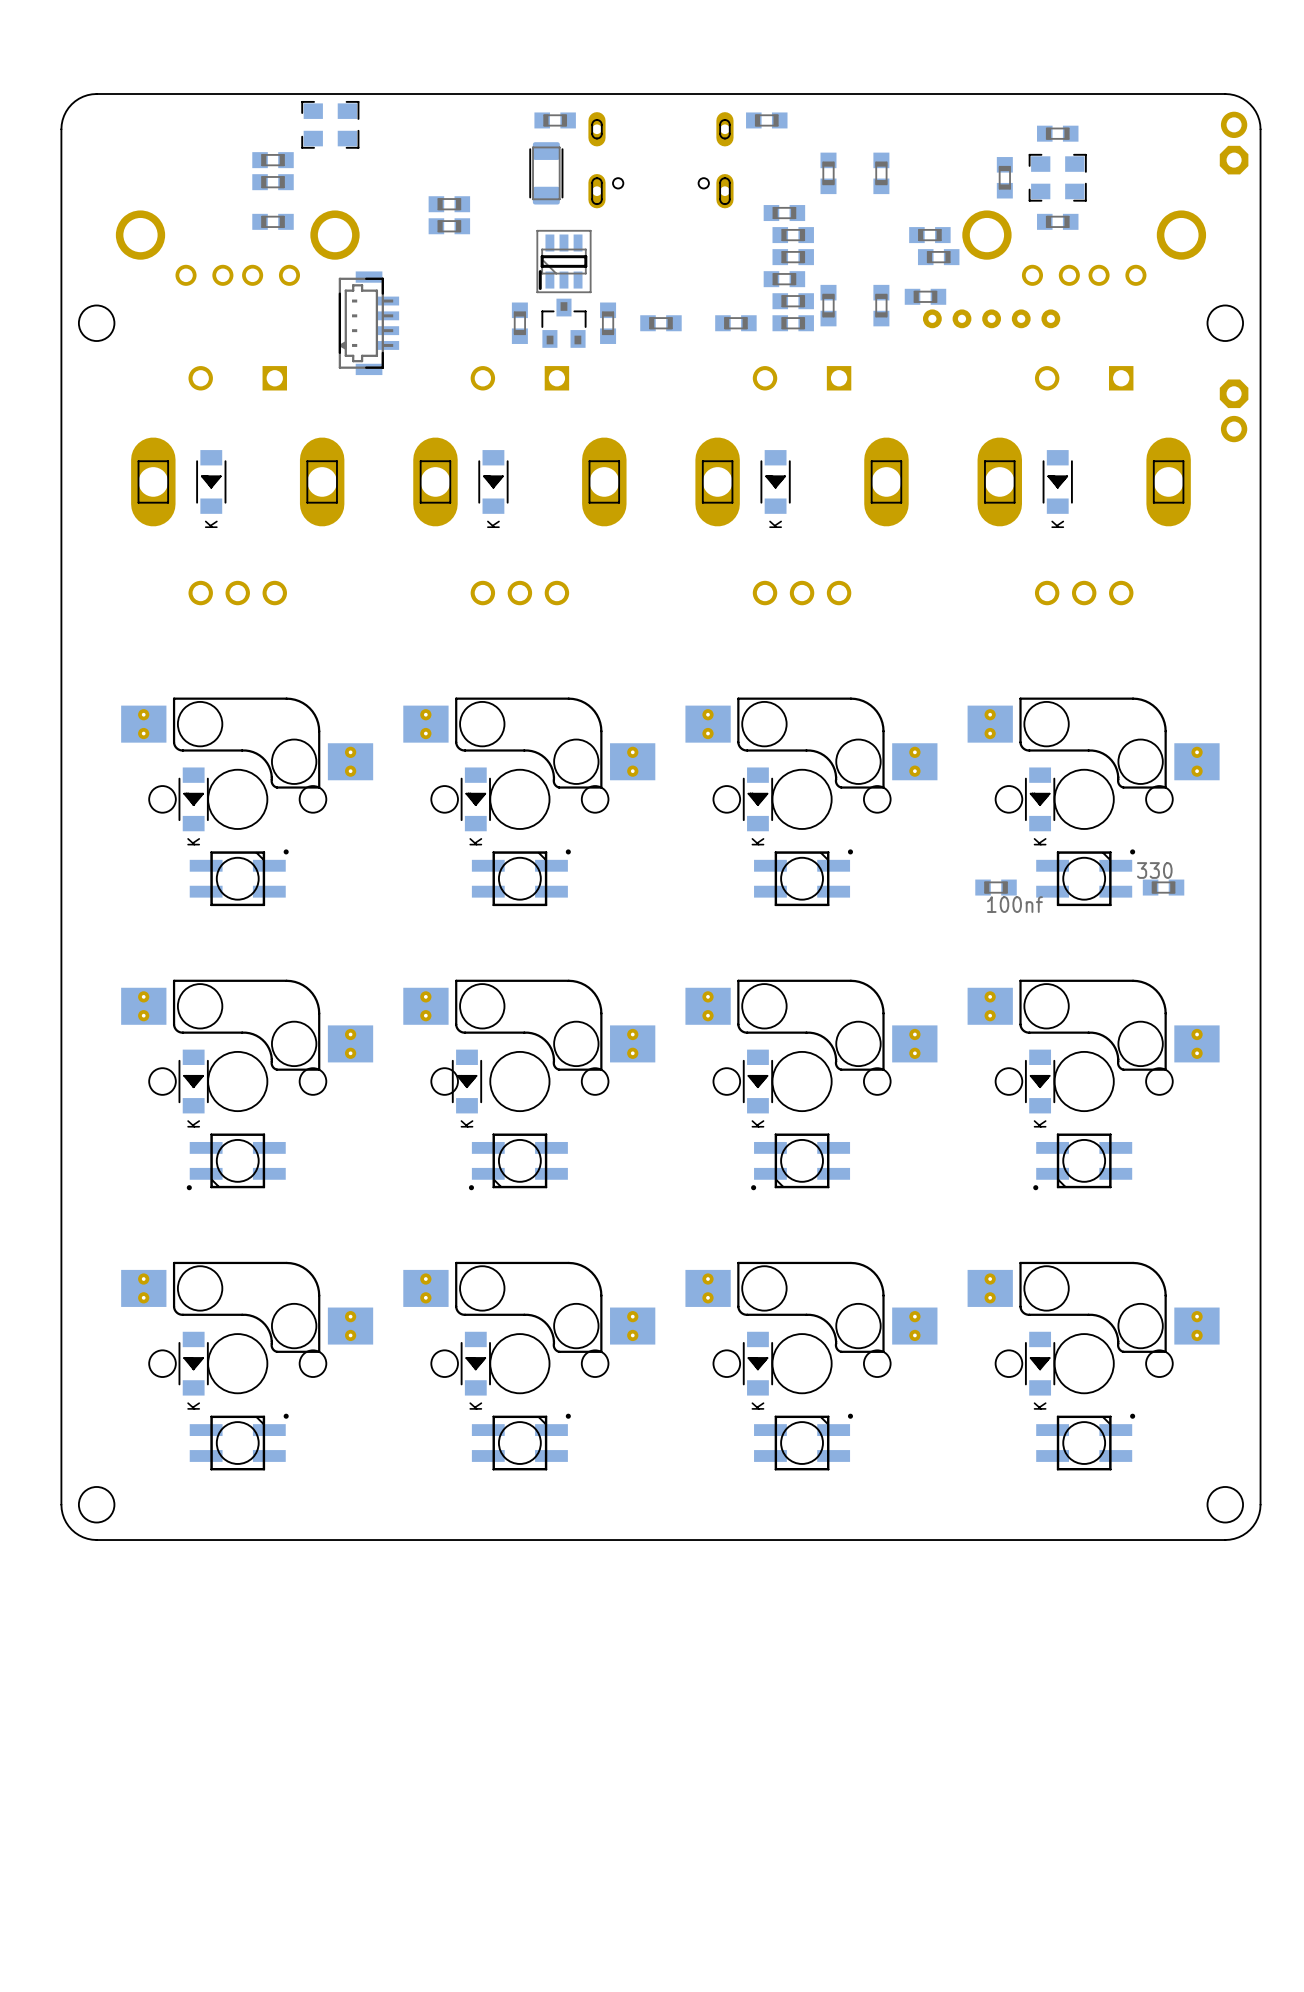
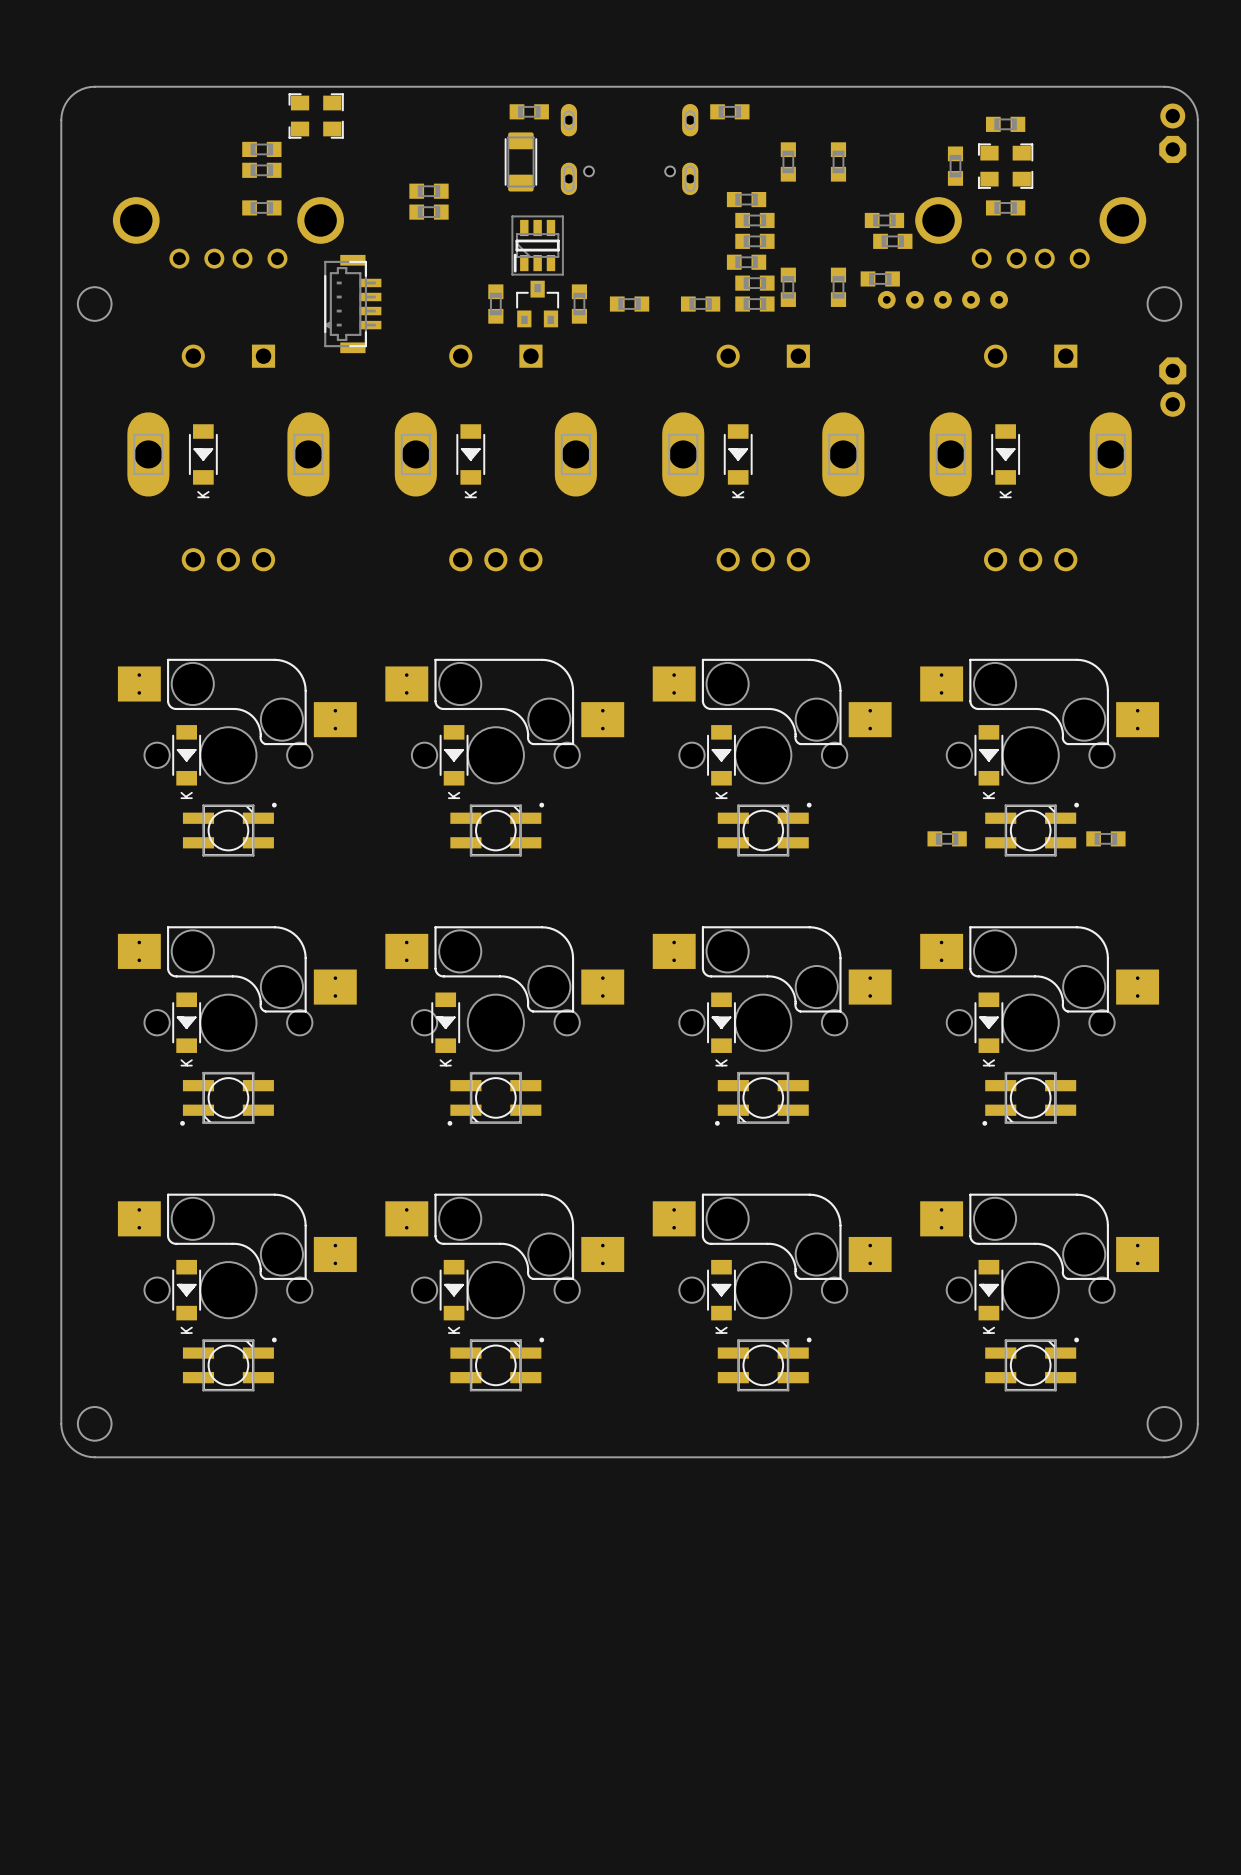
part value: 330 (1154, 870) -> none
part value: 100nf (1014, 904) -> none

